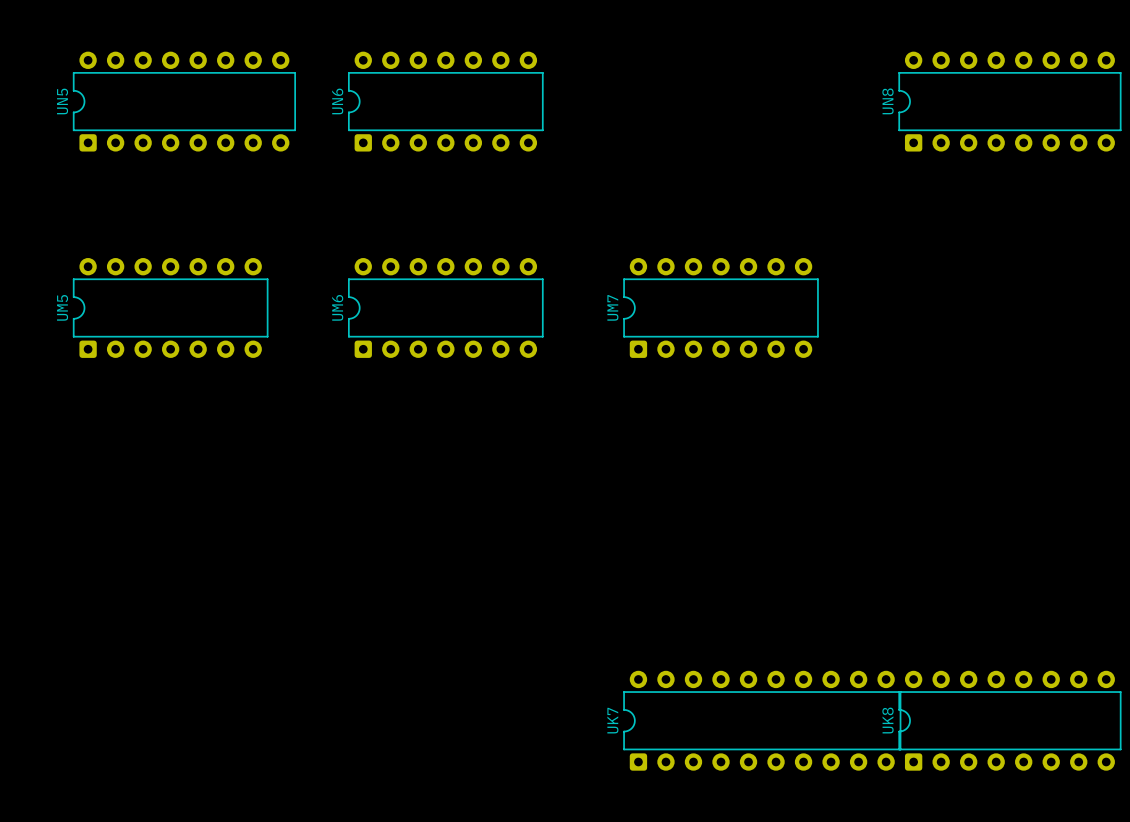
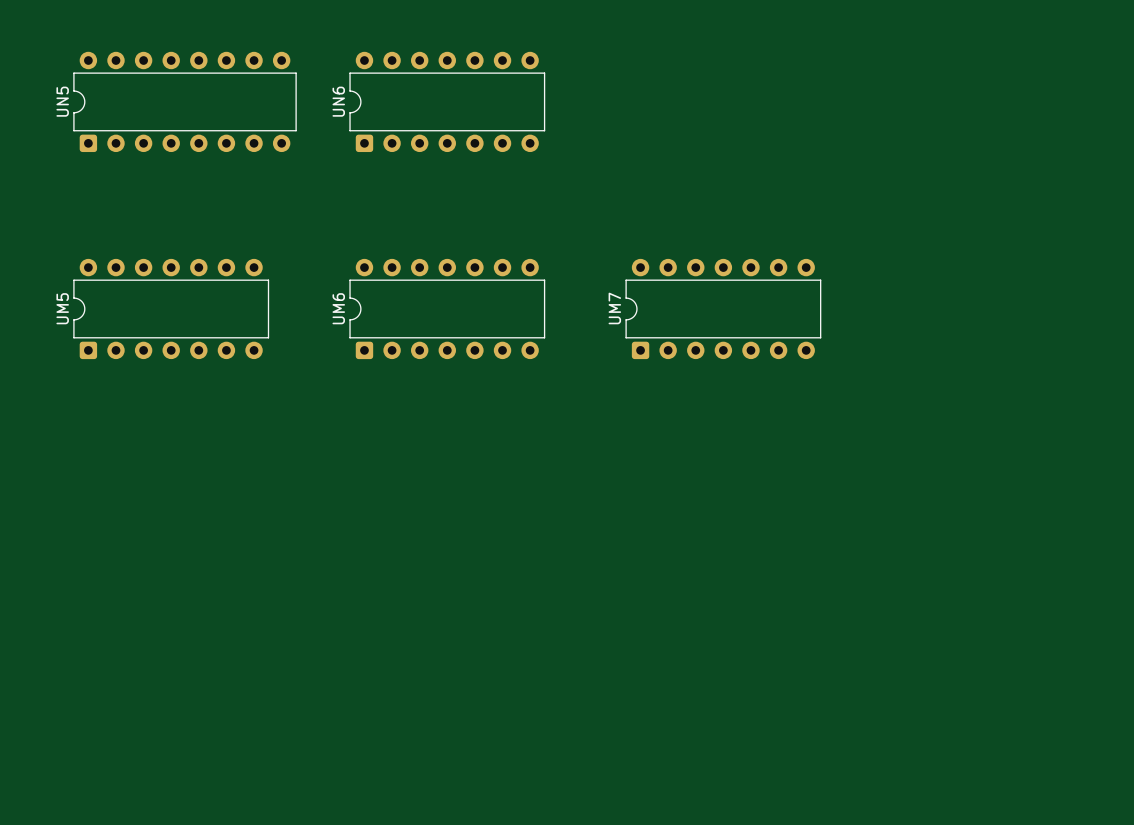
UN8: (1009, 101) -> none
UK7: (762, 720) -> none
UK8: (1009, 720) -> none

